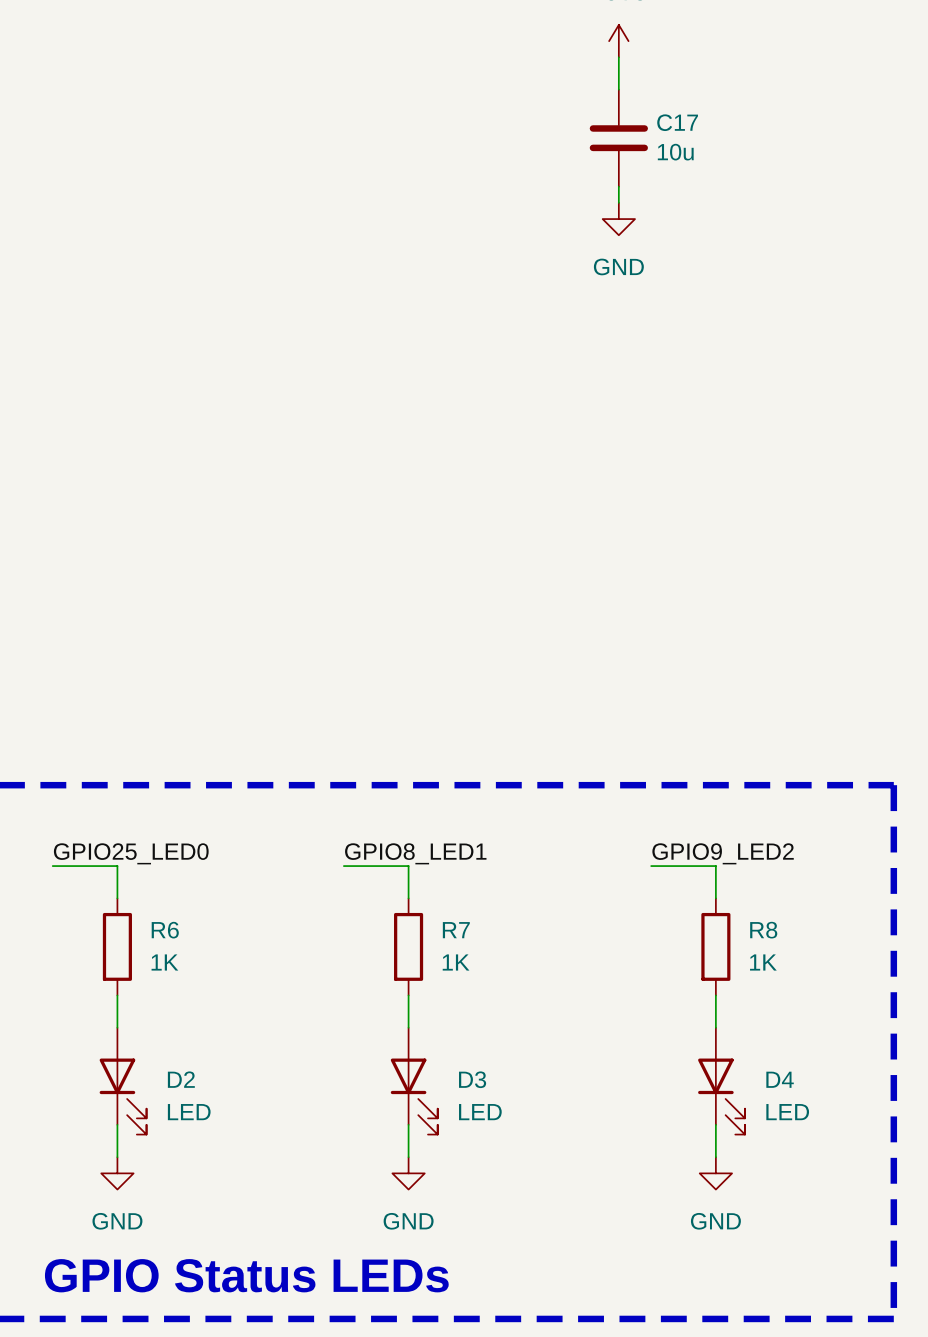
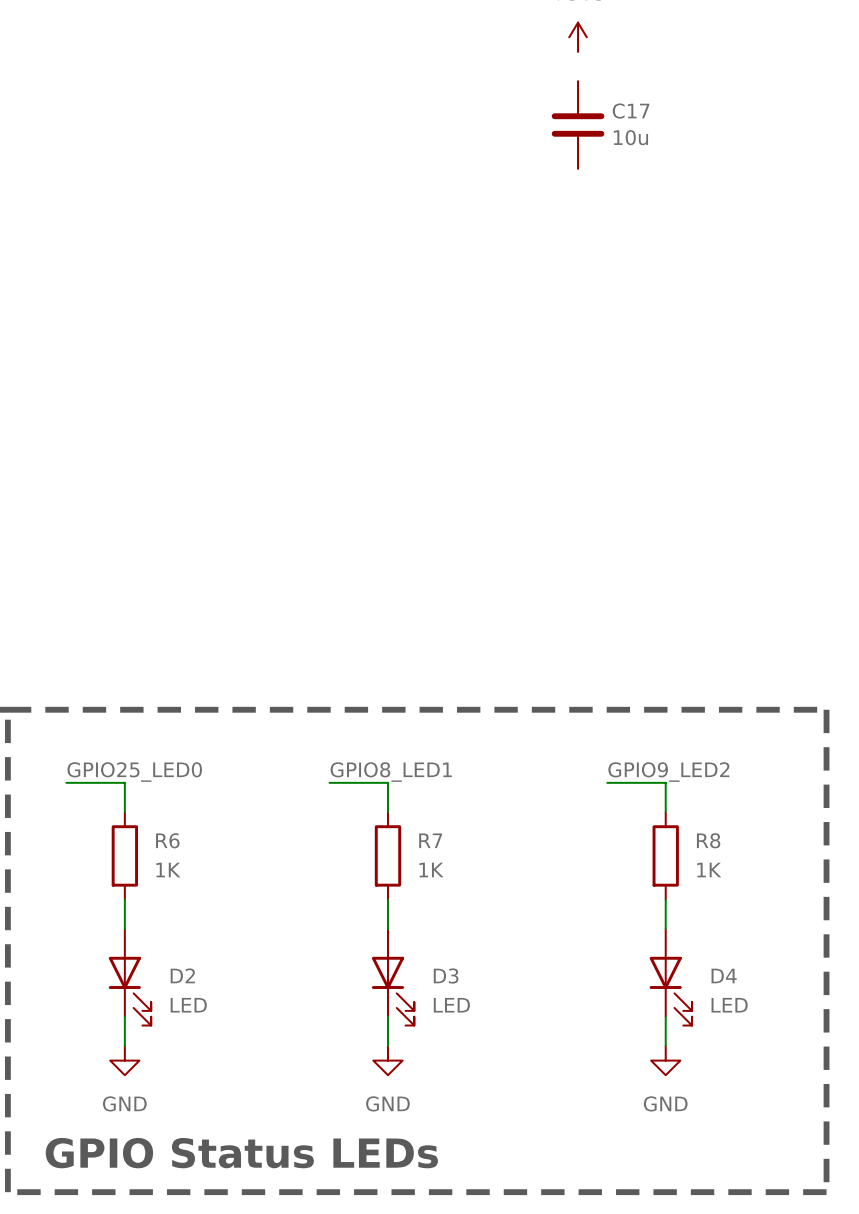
wire: (618, 57) (618, 89) -> none
wire: (618, 186) (618, 202) -> none
power symbol: GND (618, 219) -> none

